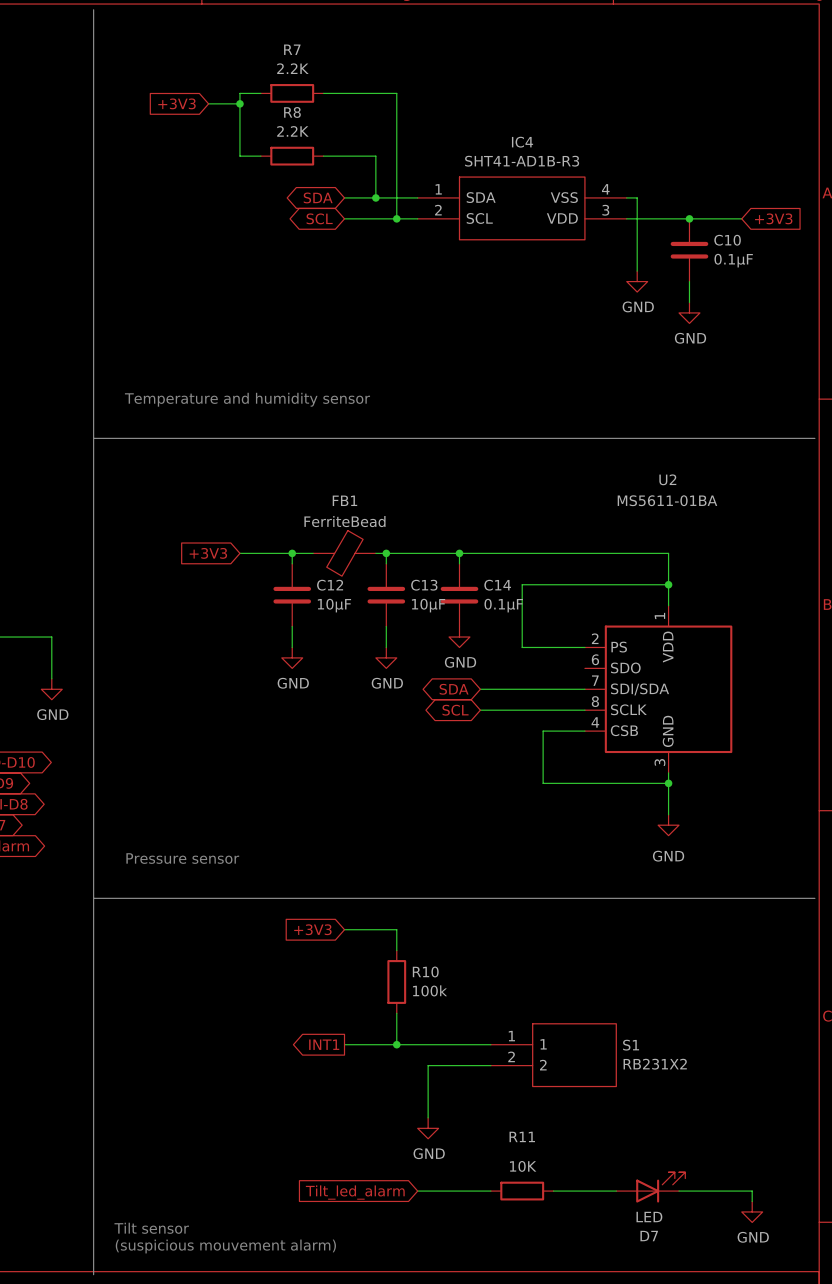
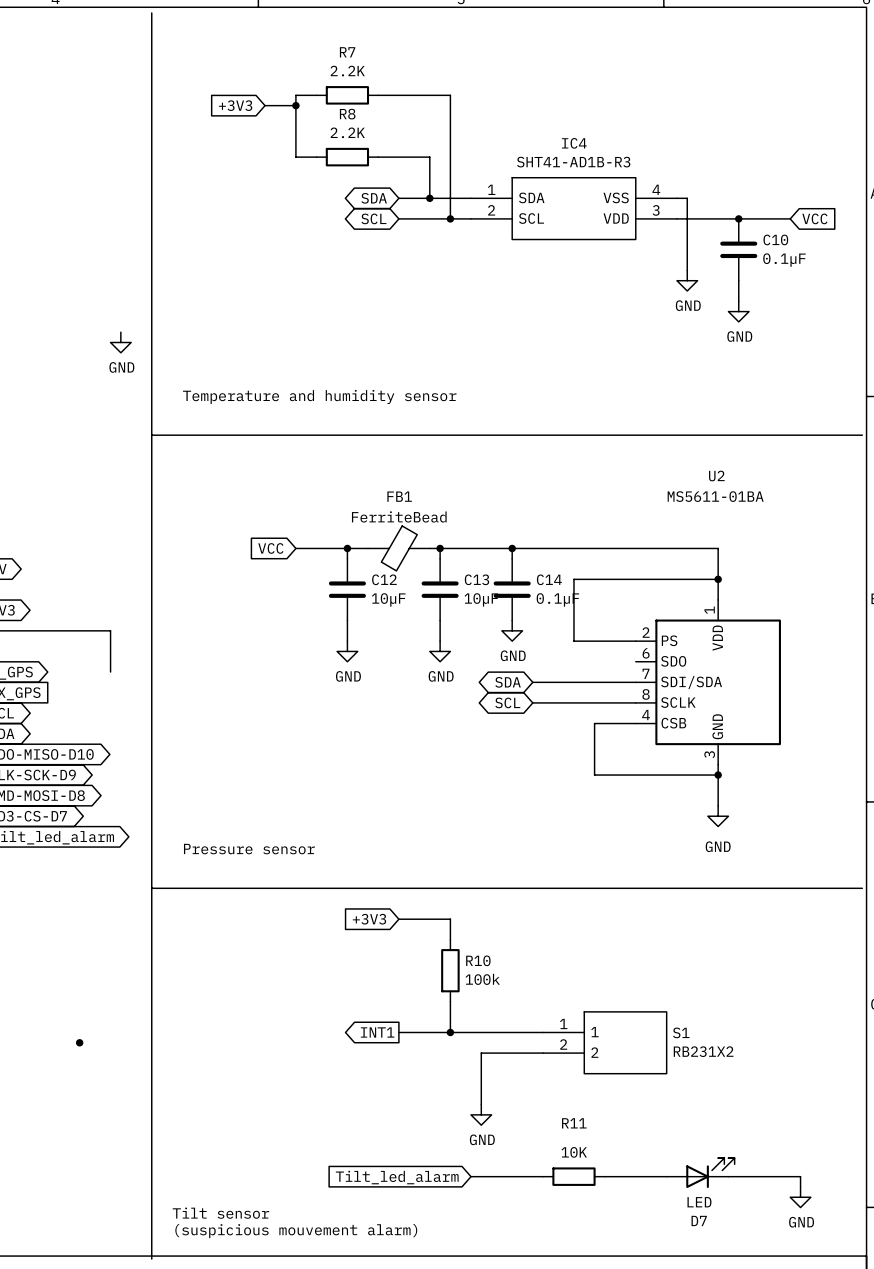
global label: +3V3 (773, 218) -> VCC (814, 218)
power symbol: none -> GND (120, 342)
global label: +3V3 (208, 553) -> VCC (270, 548)
power symbol: GND (51, 689) -> none
junction: none -> (79, 1042)

